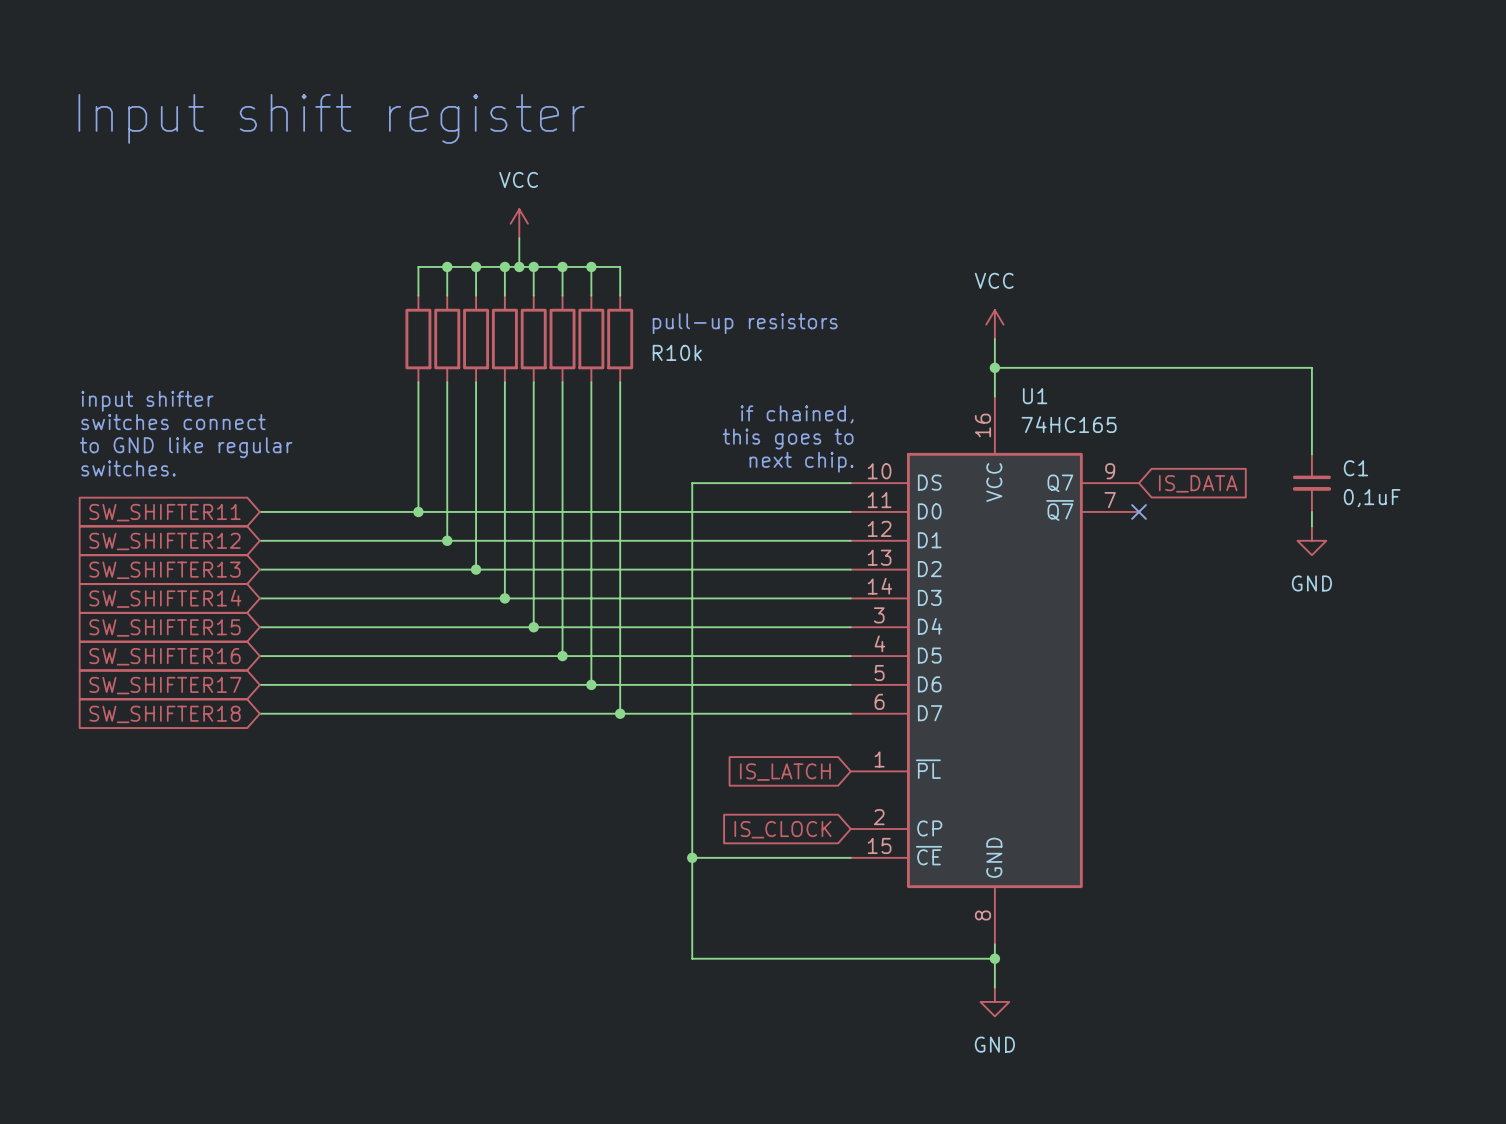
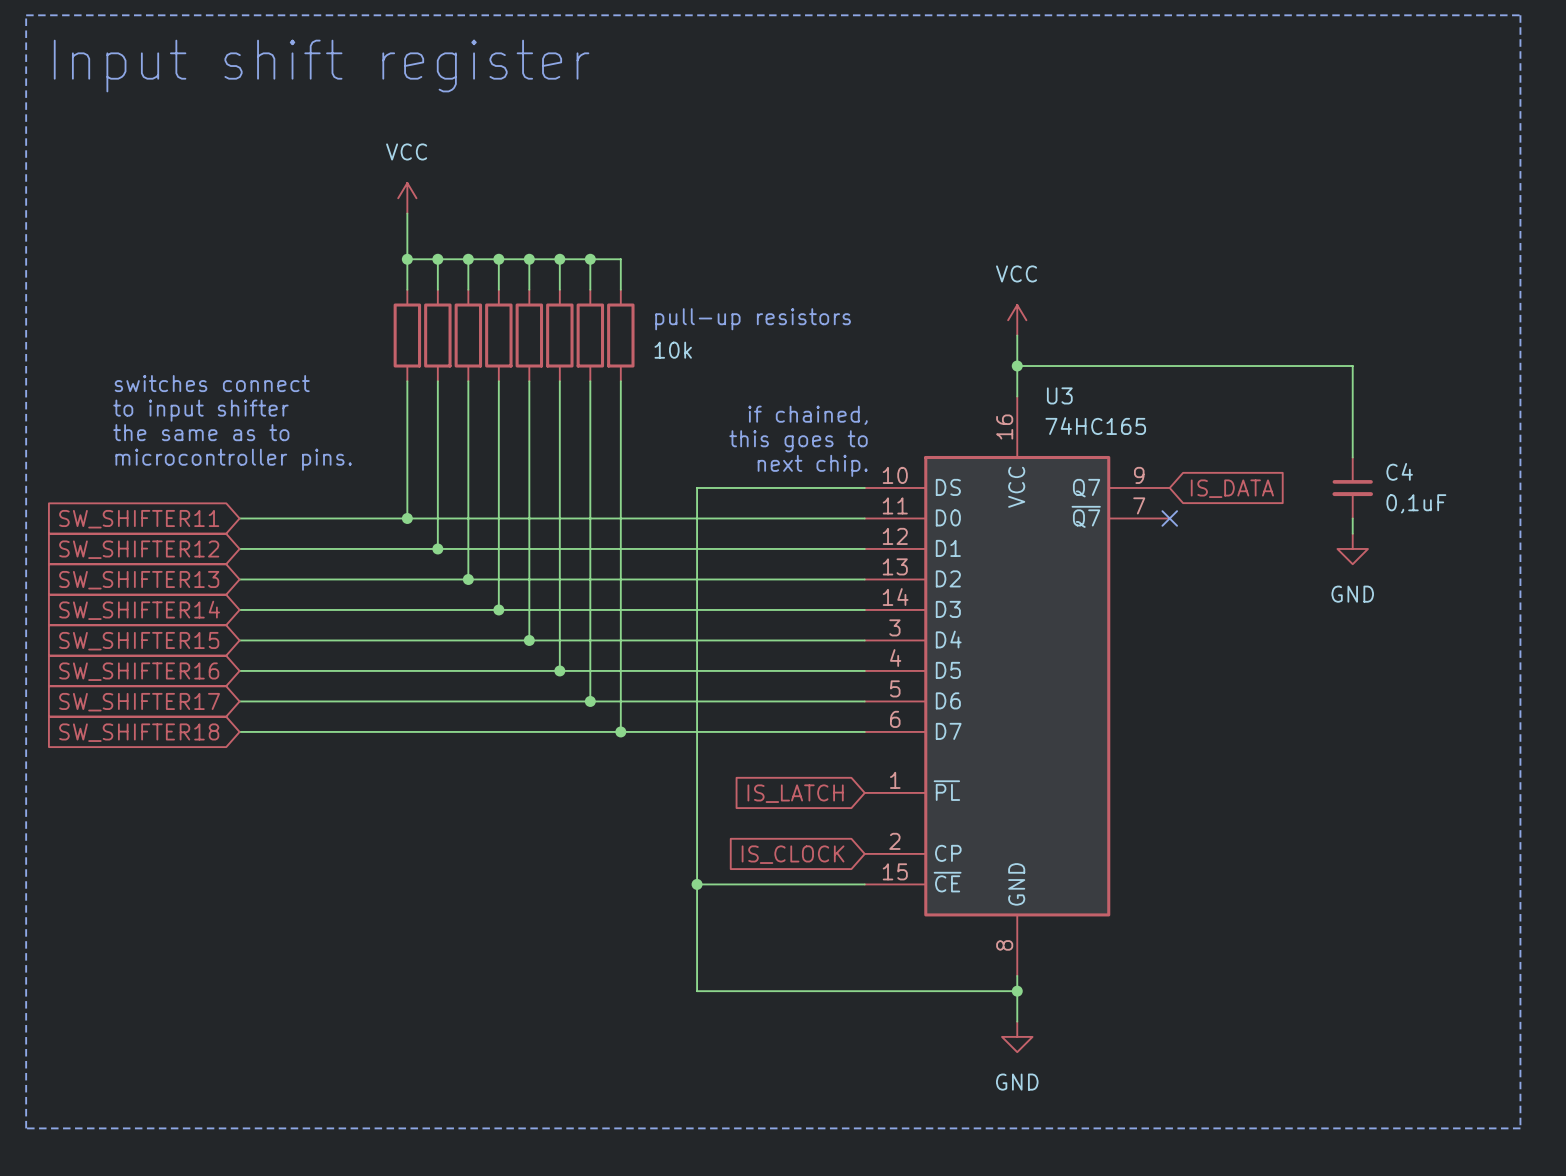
line: none -> (26, 15) (1520, 15) (1520, 1128) (26, 1128) (26, 15)
text position: Input shift register (331, 118) -> Input shift register (321, 66)
wire: none -> (407, 213) (407, 259)
power symbol position: VCC (519, 223) -> VCC (407, 198)
wire: (519, 238) (519, 266) -> none
junction: none -> (407, 259)
junction: (519, 266) -> none
part value: R10k (677, 352) -> 10k (673, 350)
U1 name: U1 (1035, 396) -> U3 (1059, 395)
text: input shifter (147, 401) -> to input shifter (200, 410)
text position: switches connect (173, 422) -> switches connect (212, 383)
text: none -> the same as to (201, 432)
text: to GND like regular (186, 447) -> none
text: none -> microcontroller pins. (233, 459)
text: switches. (128, 468) -> none
C1 name: C1 (1355, 468) -> C4 (1399, 471)

